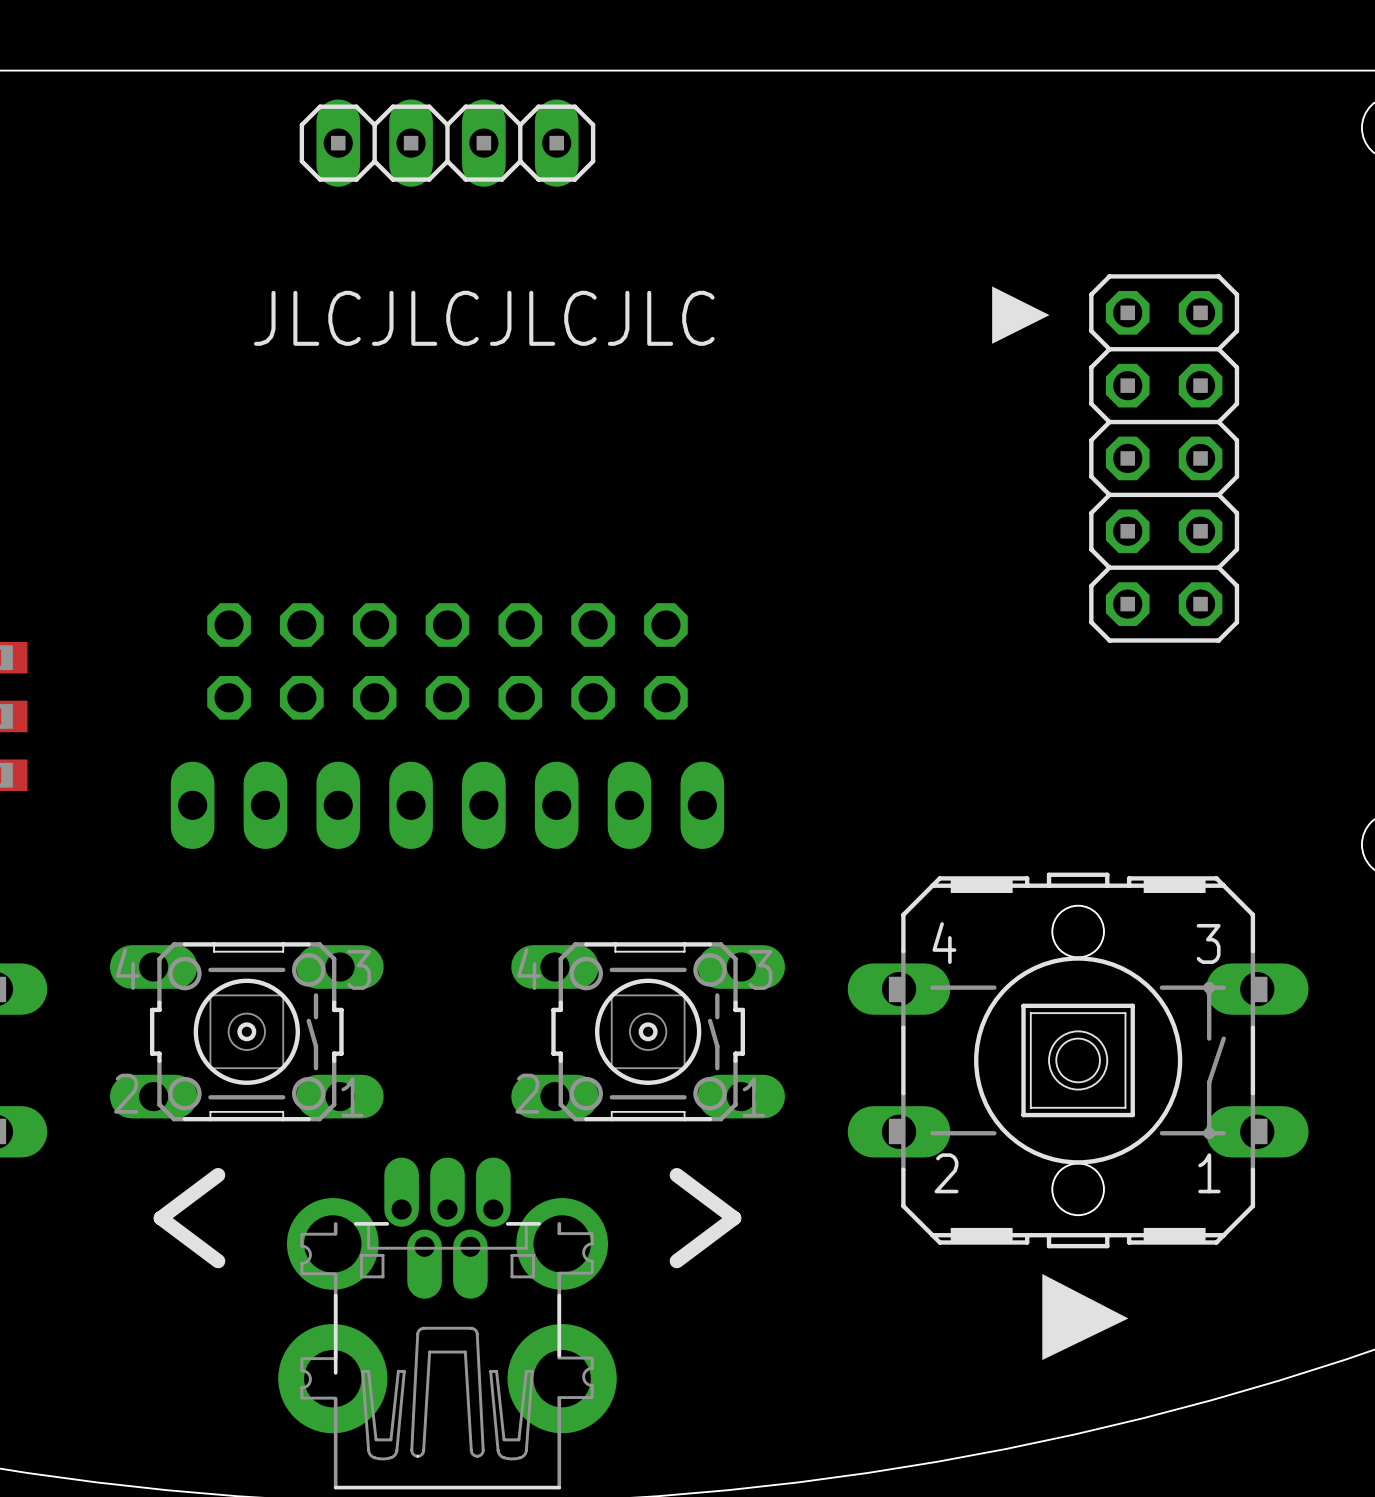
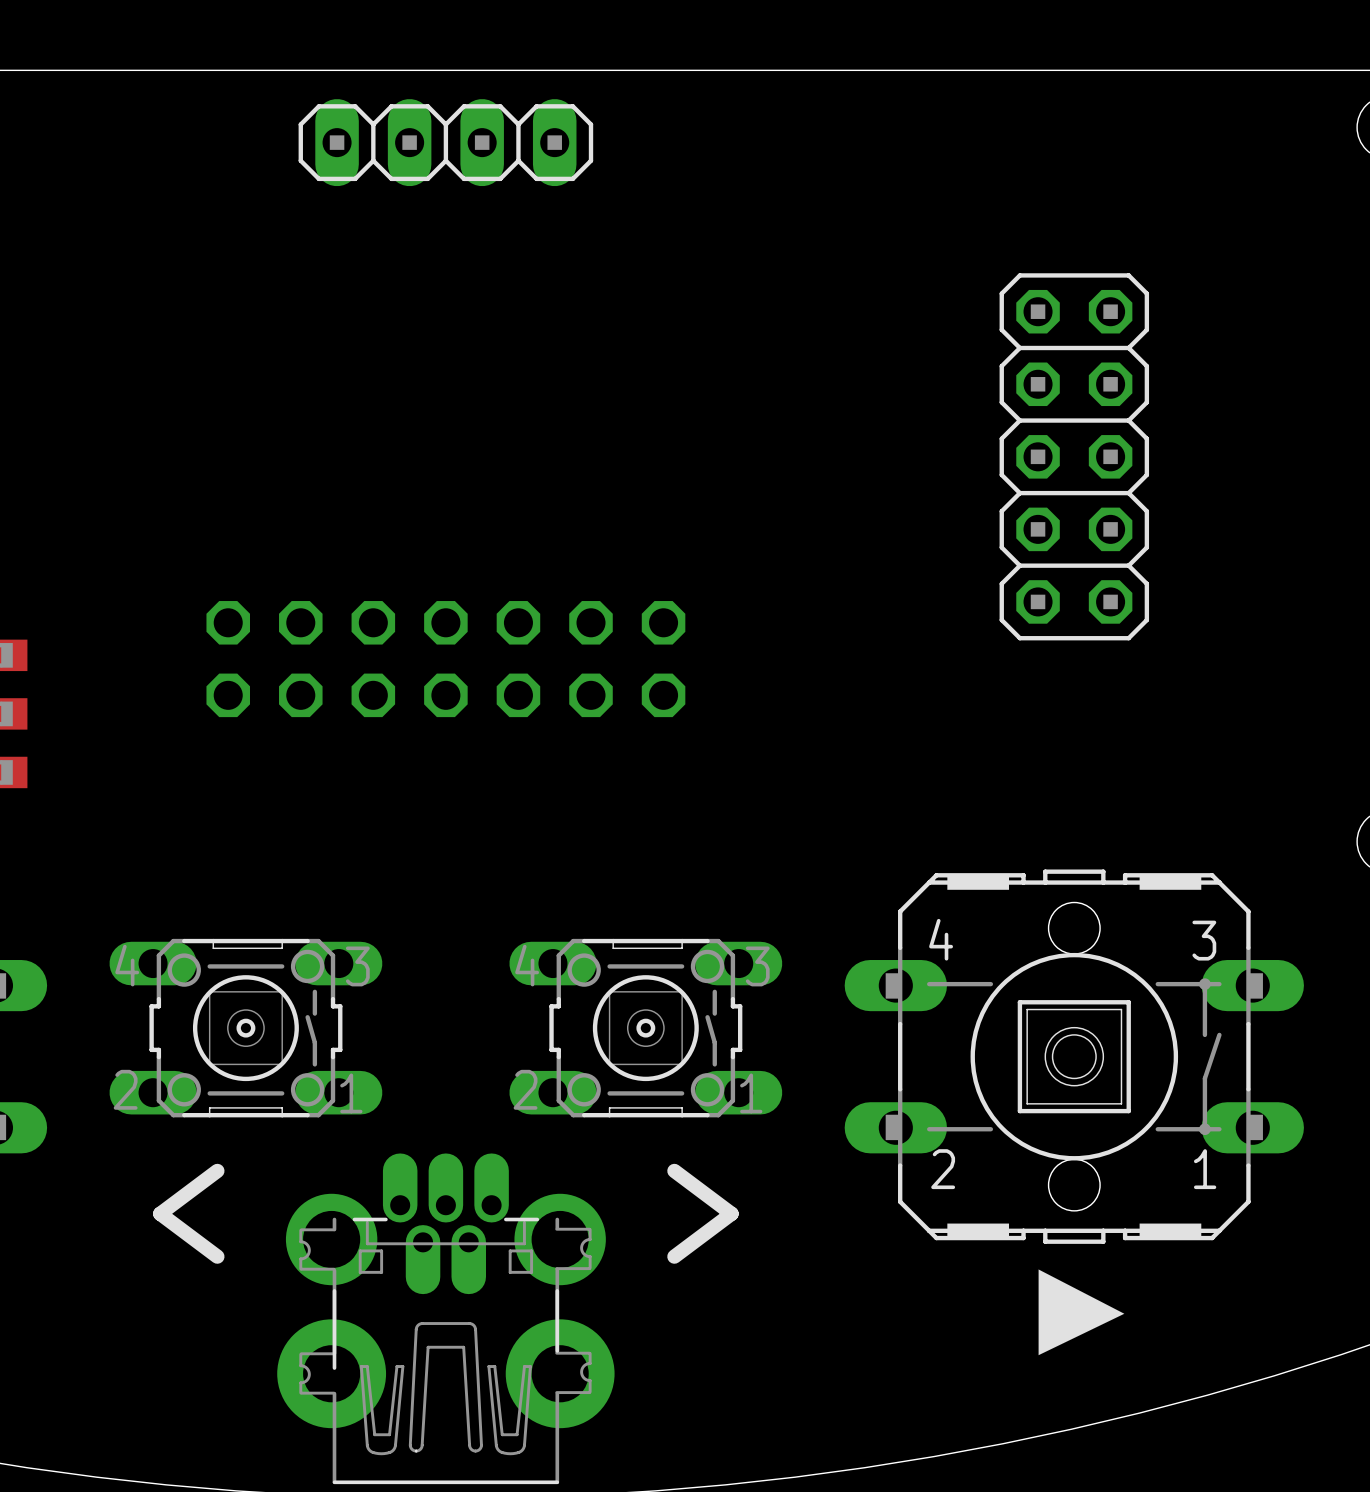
drawing: [992, 286, 1050, 344] -> none
text: JLCJLCJLCJLC (484, 318) -> none
part position: (1164, 458) -> (1074, 456)
part: (447, 805) -> none

